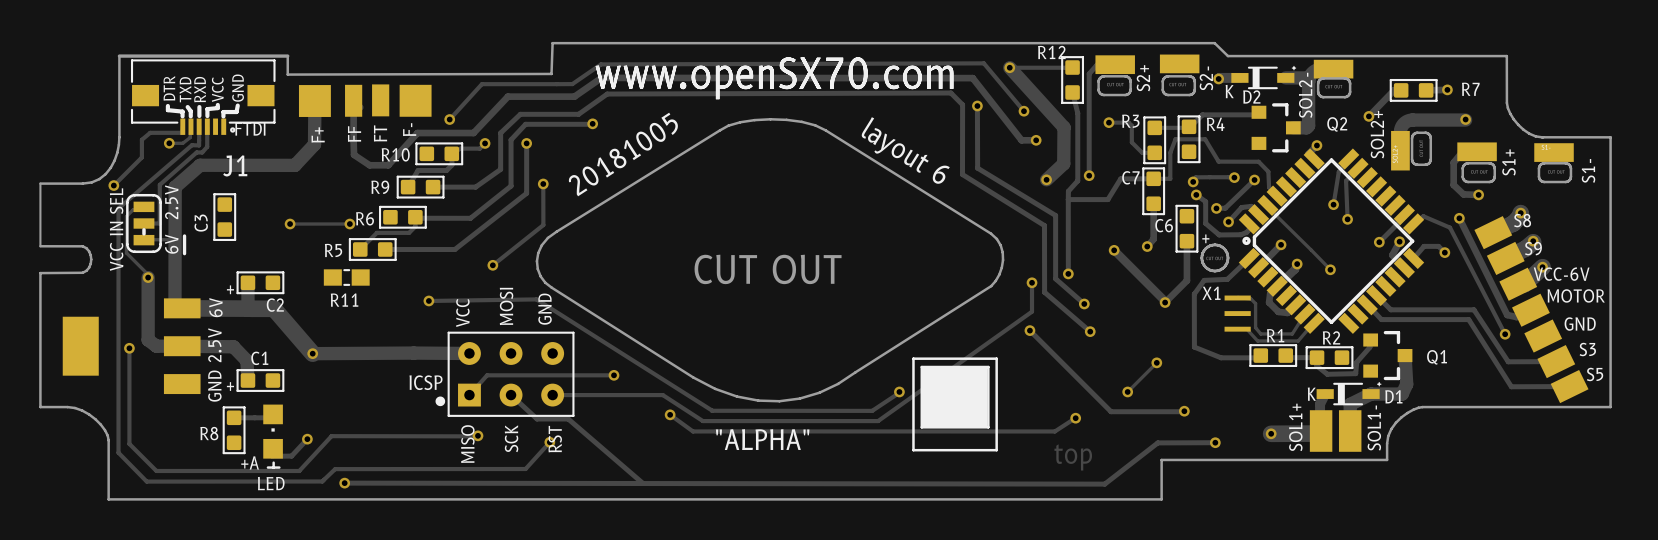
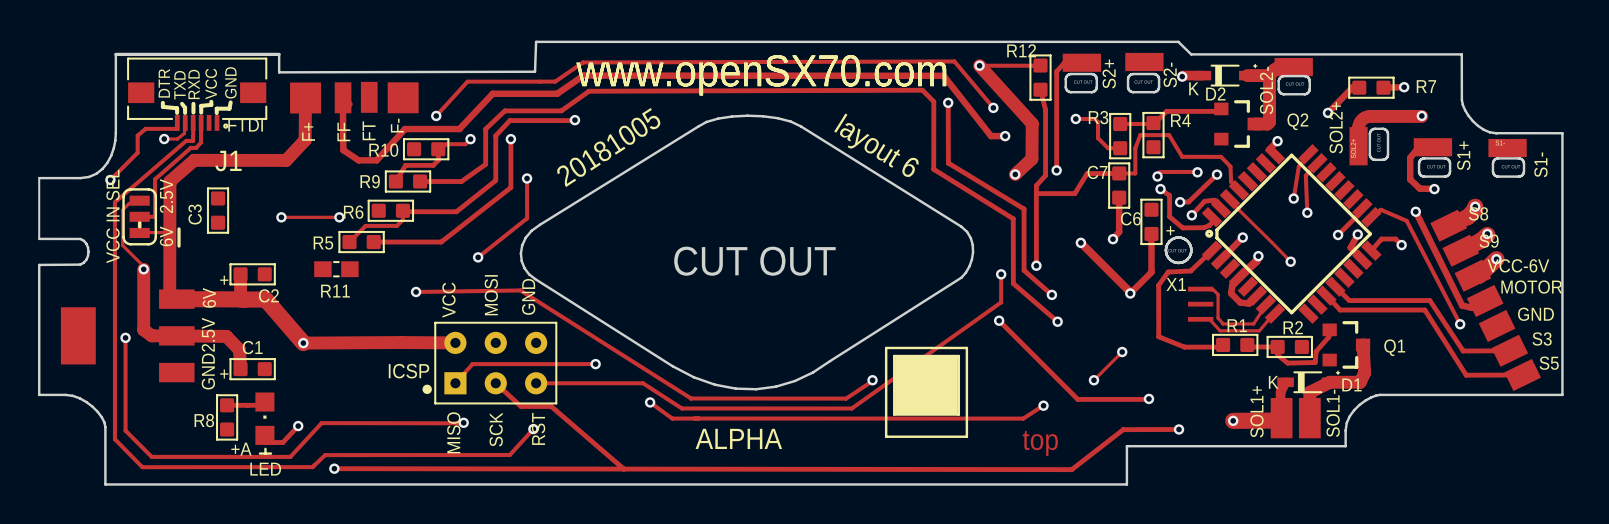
text: "ALPHA" (762, 439) -> ALPHA (738, 438)

